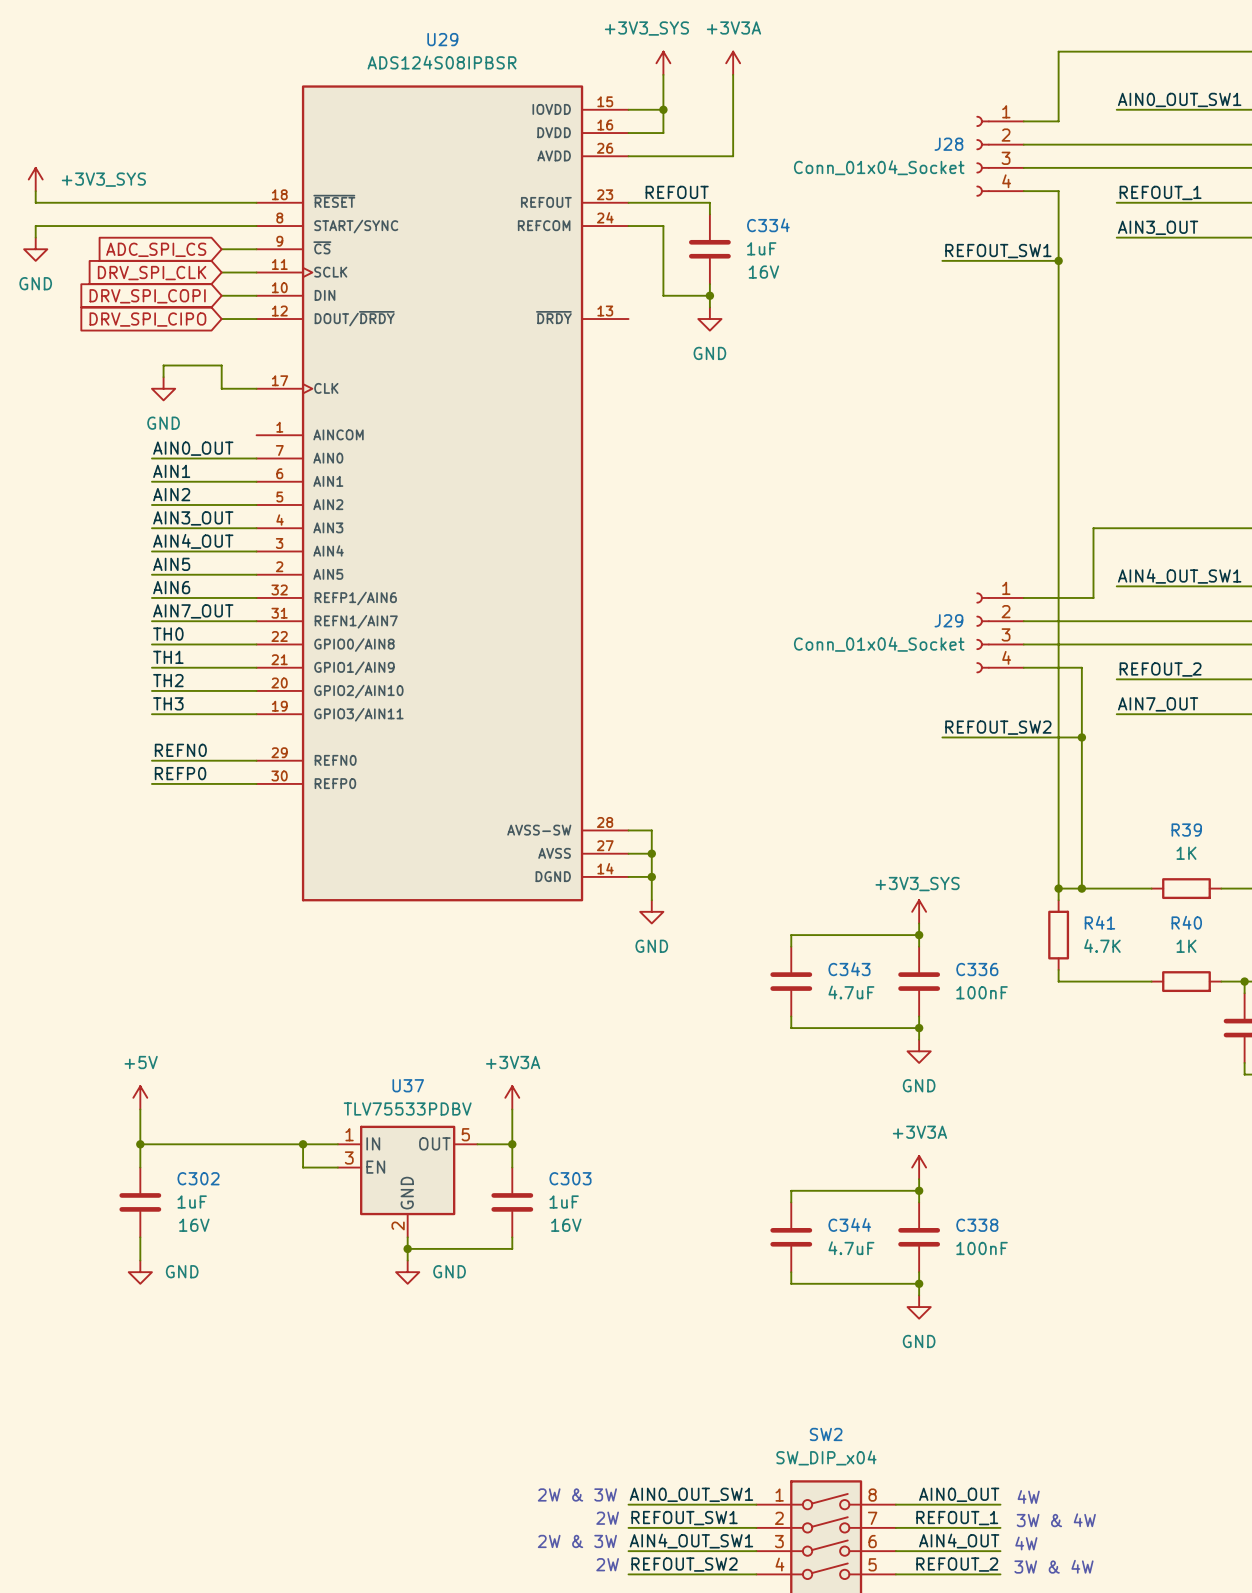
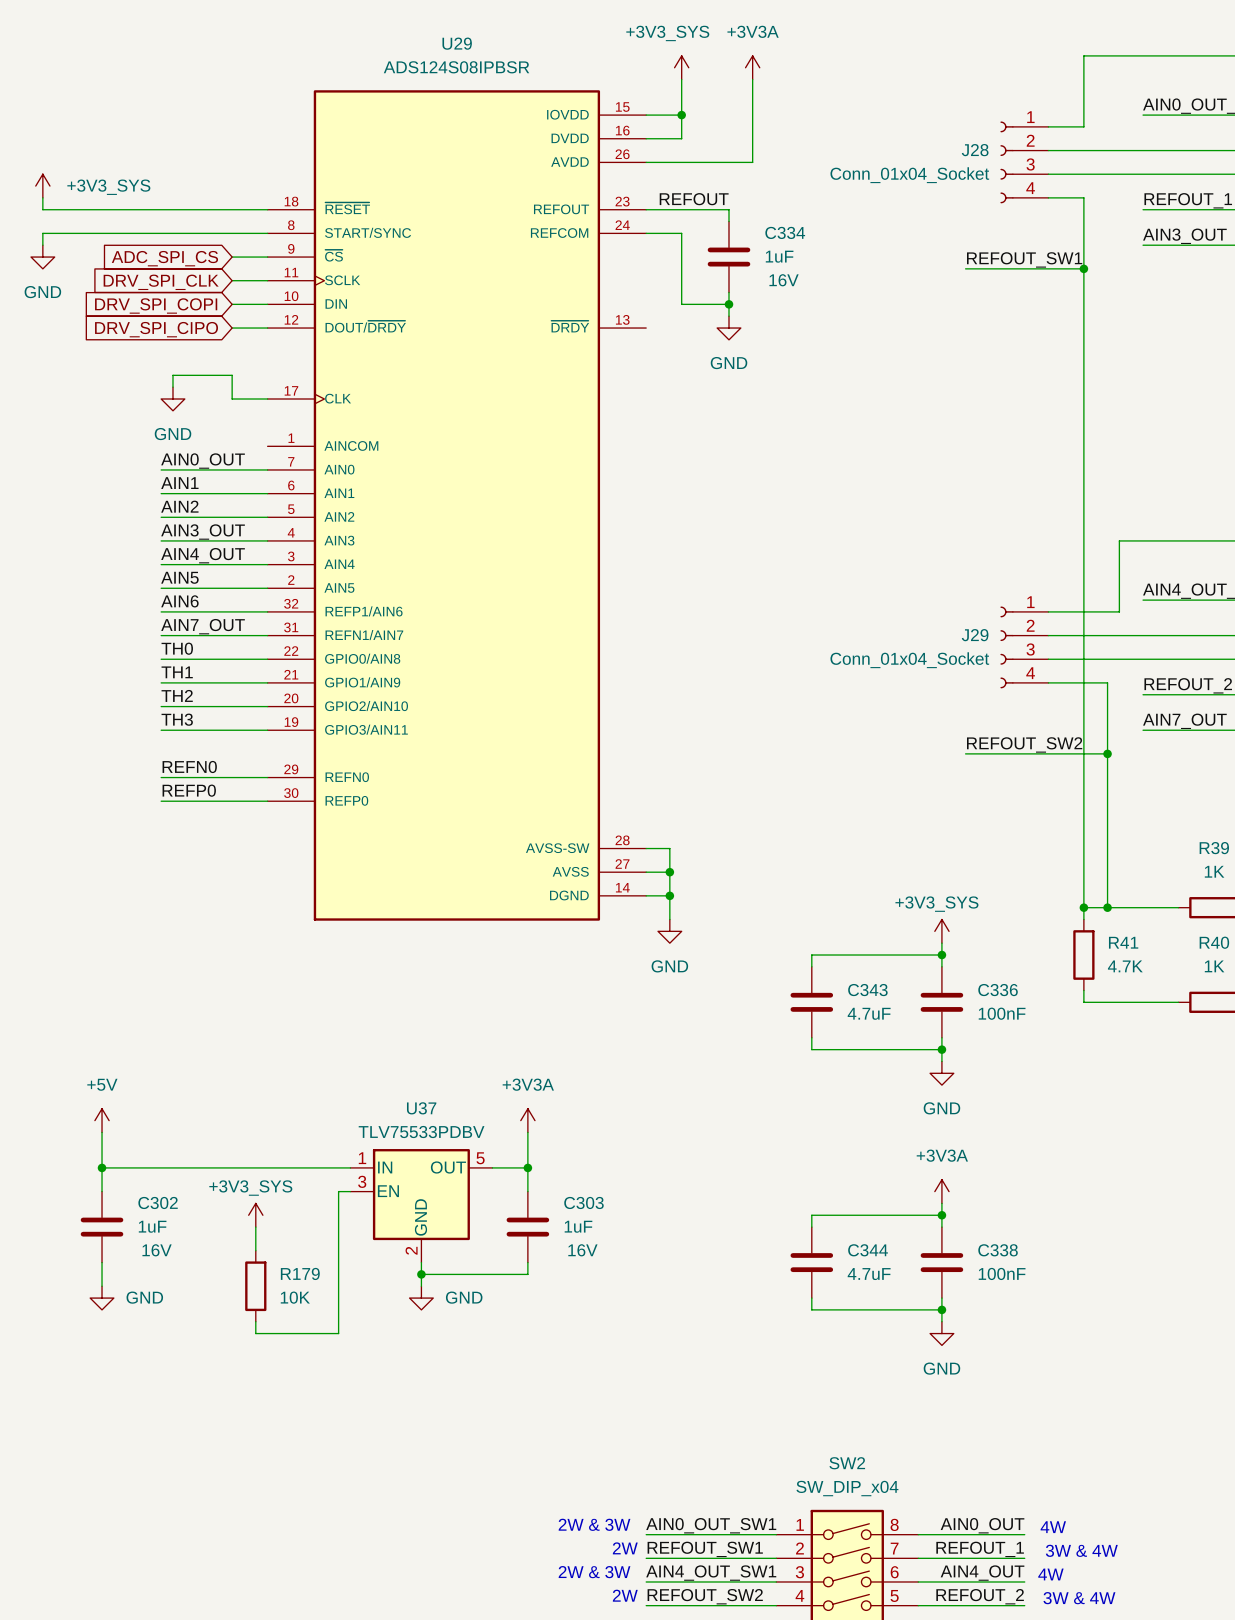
power symbol position: +5V (140, 1097) -> +5V (102, 1120)
wire: (140, 1109) (140, 1167) -> (102, 1132) (102, 1191)
wire: none -> (102, 1167) (149, 1167)
junction position: (140, 1144) -> (102, 1167)
wire: (303, 1144) (303, 1167) (326, 1167) -> (255, 1321) (255, 1333) (338, 1333) (338, 1191)
junction: (303, 1144) -> none
power symbol: none -> +3V3_SYS (255, 1215)
C302 position: (140, 1202) -> (102, 1227)
wire: none -> (255, 1227) (255, 1250)
wire: (140, 1237) (140, 1260) -> (102, 1262) (102, 1286)
R179: none -> 10K (255, 1286)
power symbol position: GND (140, 1272) -> GND (102, 1298)

